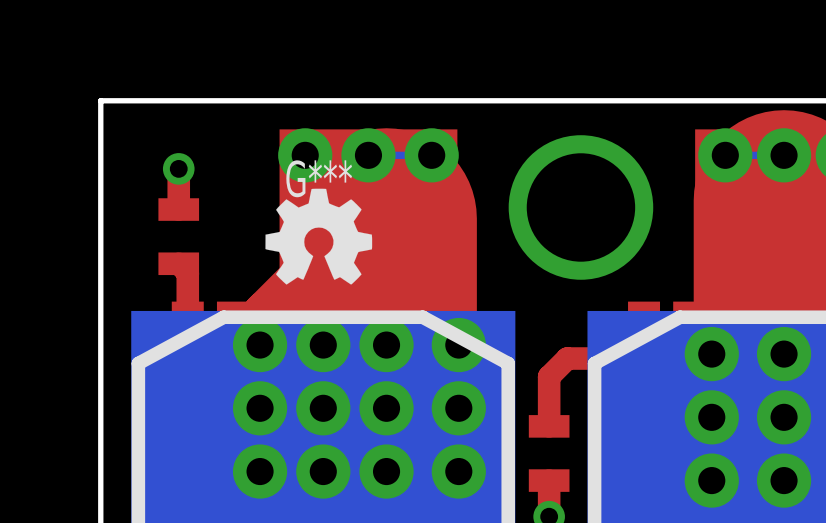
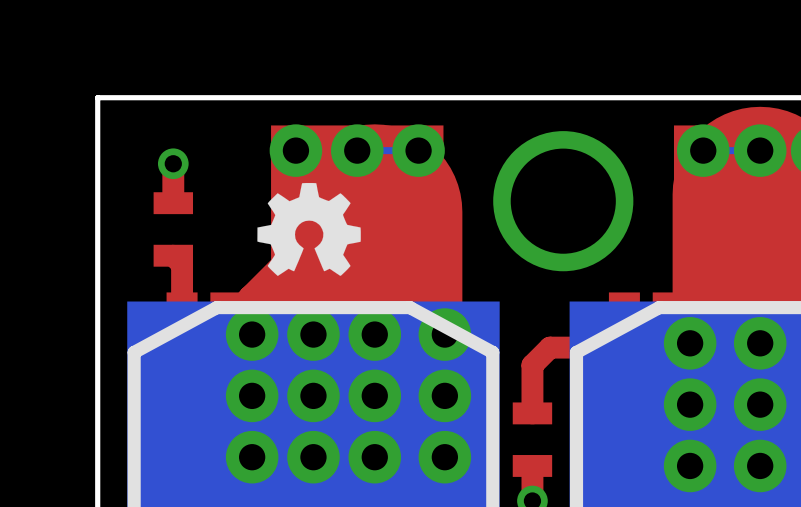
G***: (318, 236) -> none

